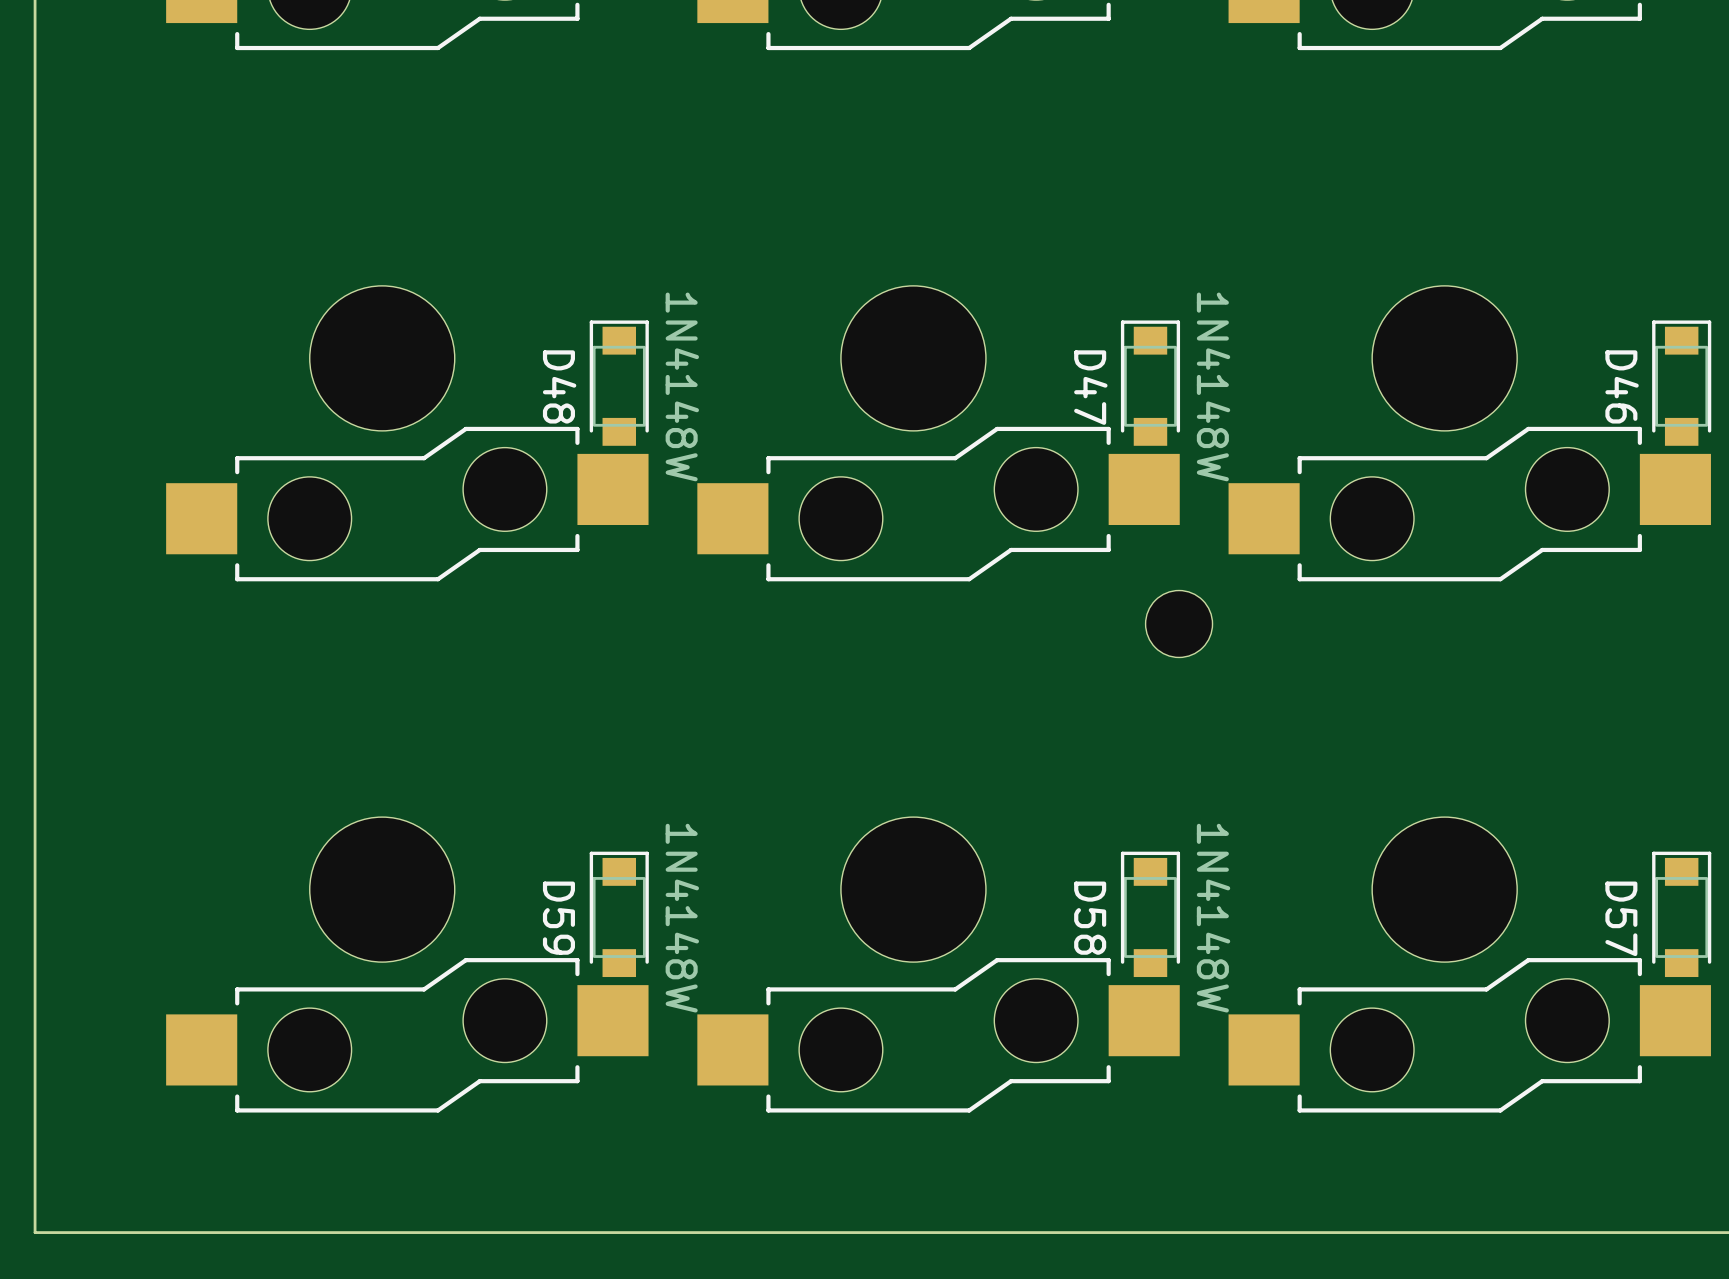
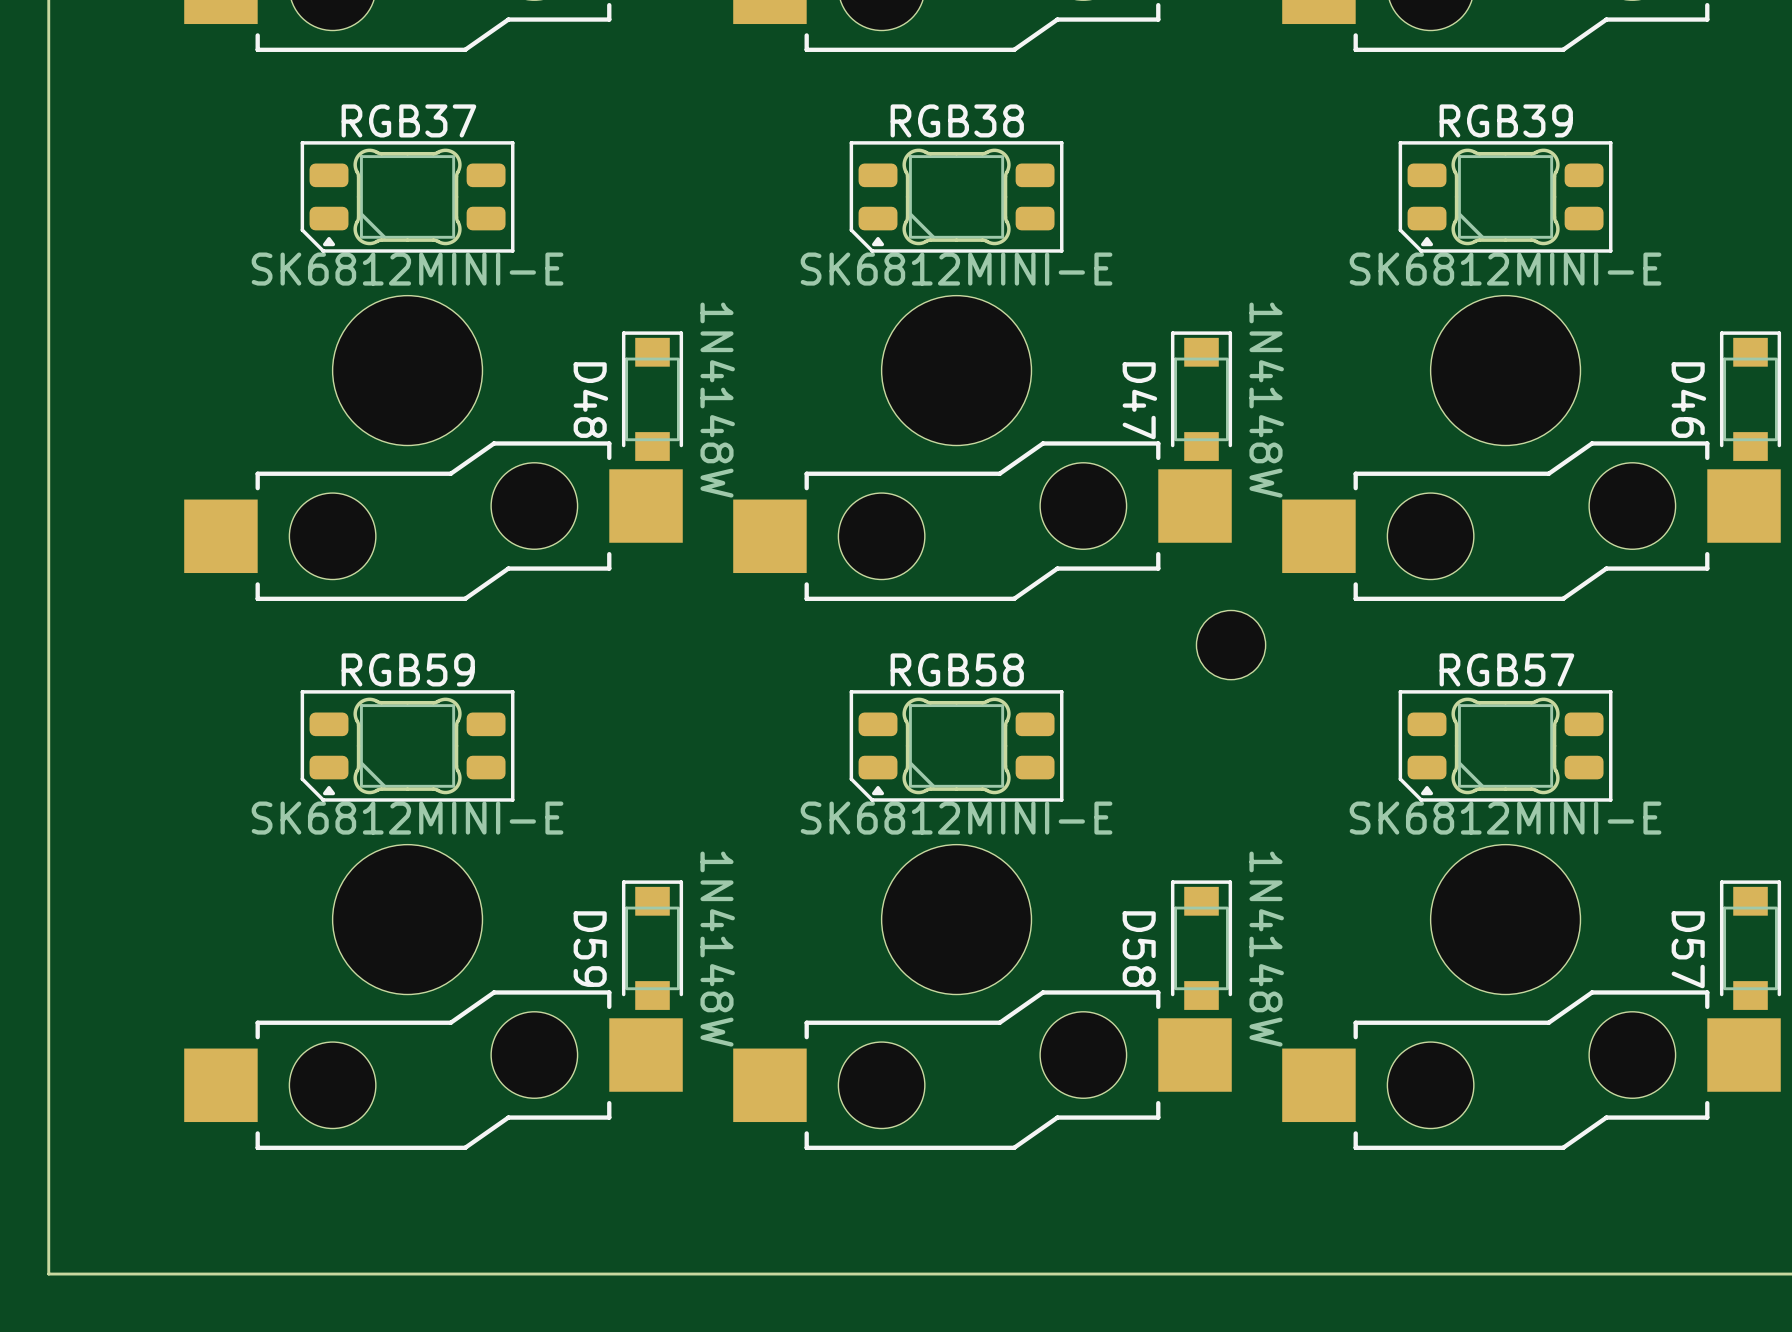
RGB37: none -> SK6812MINI-E (407, 196)
RGB38: none -> SK6812MINI-E (956, 196)
RGB39: none -> SK6812MINI-E (1505, 196)
RGB59: none -> SK6812MINI-E (407, 745)
RGB58: none -> SK6812MINI-E (956, 745)
RGB57: none -> SK6812MINI-E (1505, 745)

